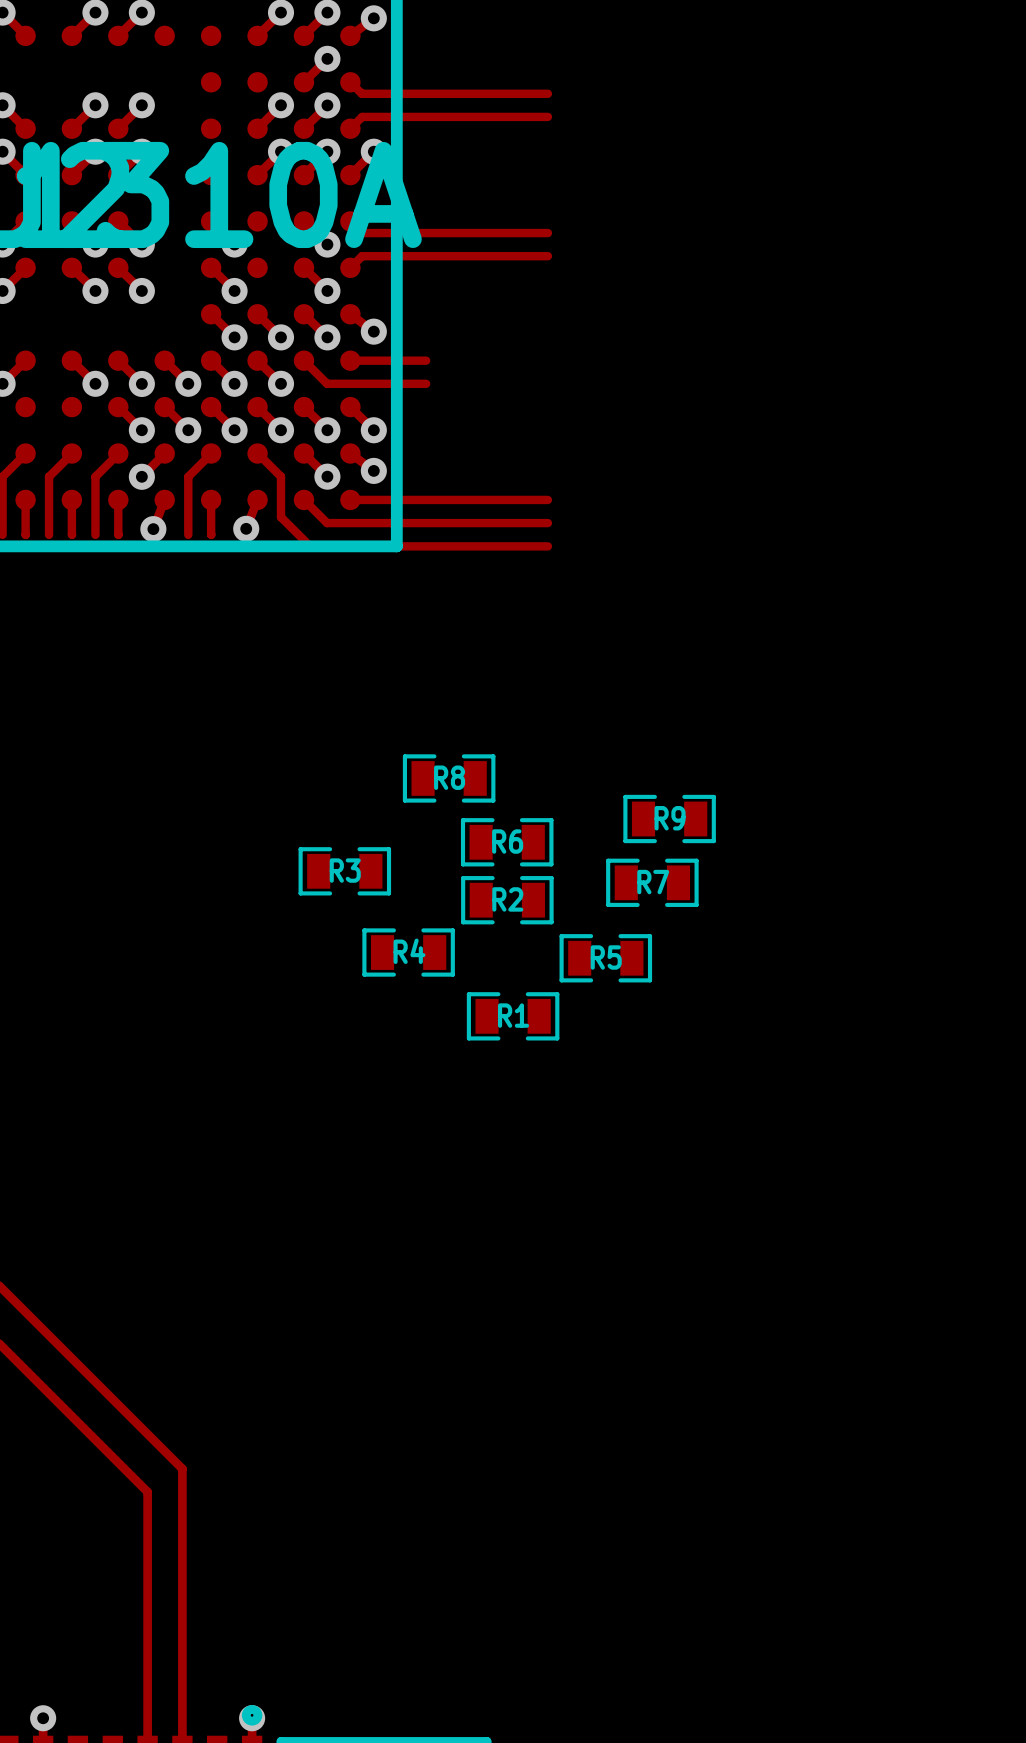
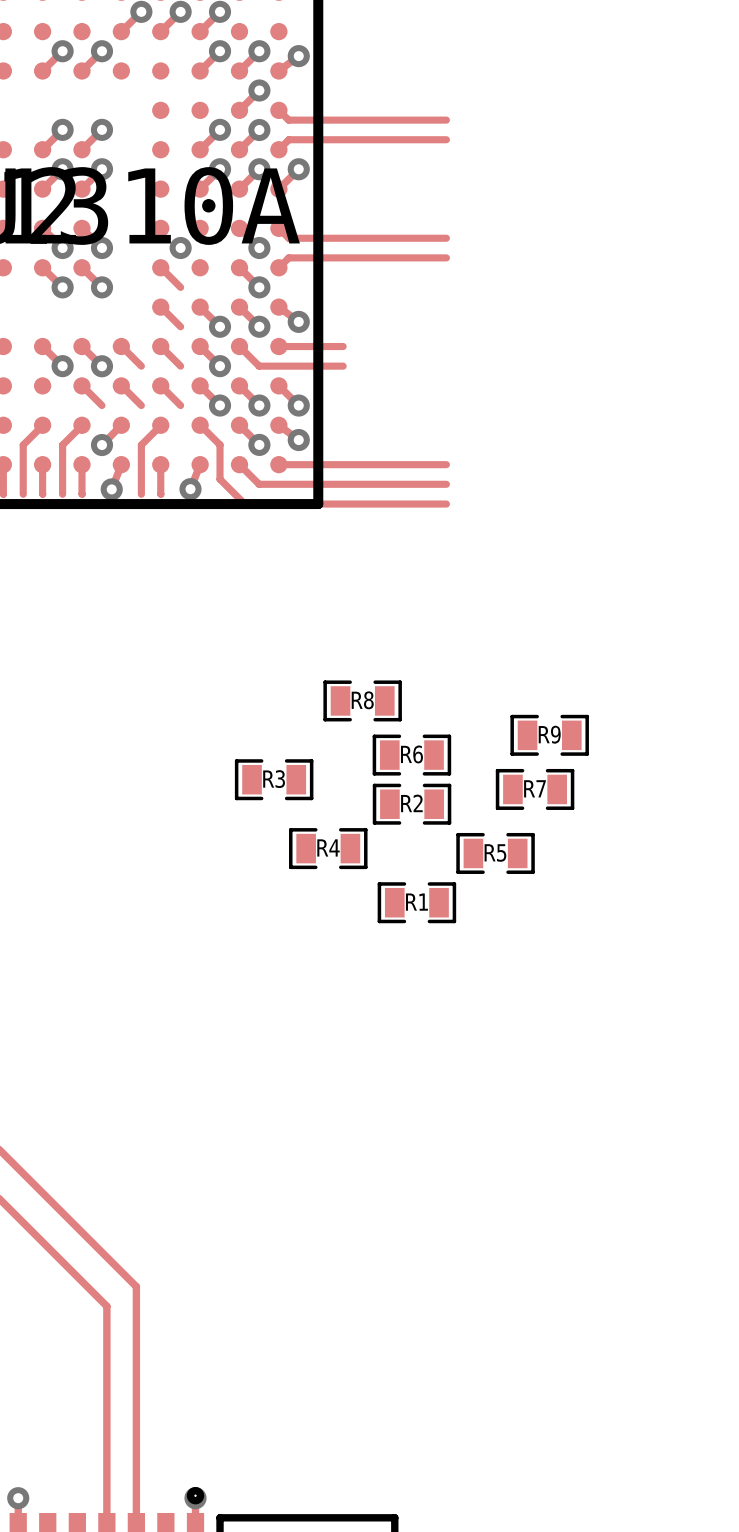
via: (234, 290) -> none
via: (234, 337) -> none
via: (188, 383) -> none
via: (234, 383) -> none
via: (141, 430) -> none
via: (188, 430) -> none
via: (234, 430) -> none

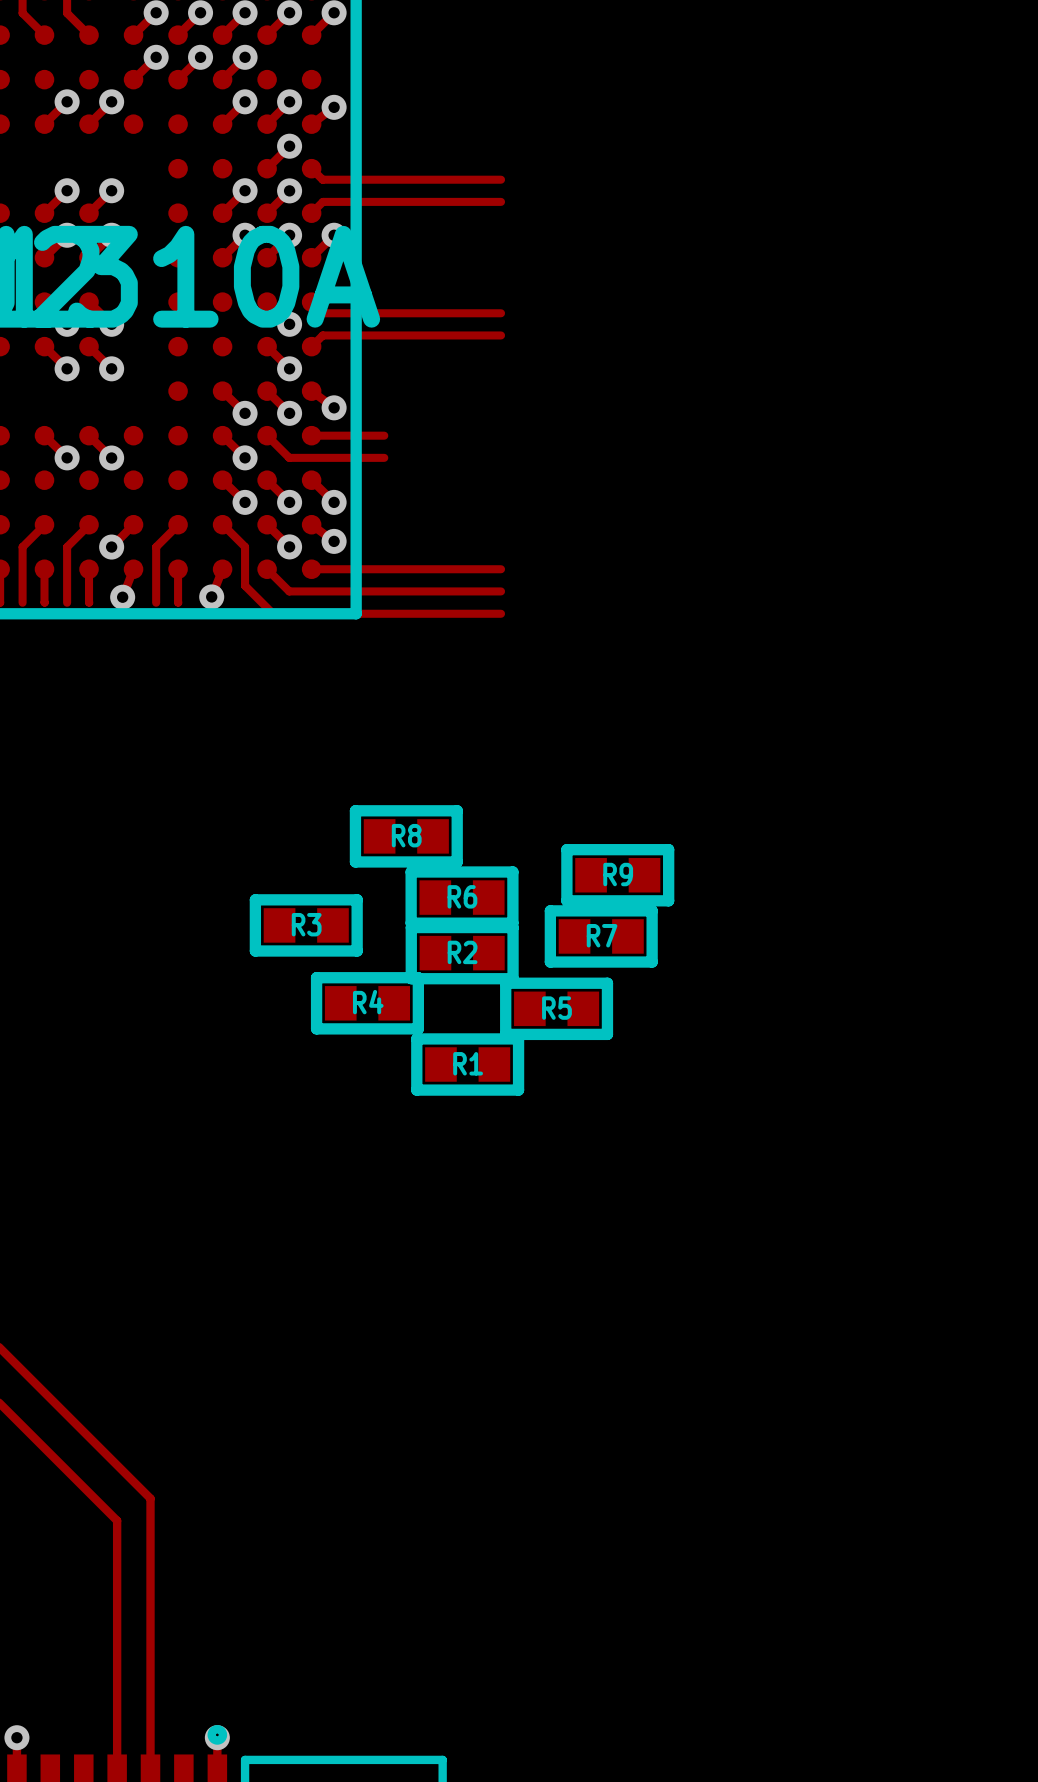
via: (180, 248) -> none
track: (161, 267) (180, 287) -> none
track: (161, 307) (180, 326) -> none
track: (121, 346) (141, 366) -> none
track: (161, 346) (180, 366) -> none
track: (82, 385) (101, 405) -> none
track: (121, 385) (141, 405) -> none
track: (161, 385) (180, 405) -> none
R8 footprint: [323, 680, 402, 722] -> [349, 805, 463, 868]
R9 footprint: [510, 714, 589, 756] -> [561, 844, 675, 907]
R6 footprint: [372, 734, 452, 776] -> [405, 866, 519, 929]
R3 footprint: [234, 759, 314, 801] -> [249, 894, 363, 957]
R7 footprint: [495, 768, 575, 810] -> [544, 905, 658, 968]
R2 footprint: [372, 783, 452, 825] -> [405, 921, 519, 985]
R4 footprint: [289, 828, 368, 870] -> [310, 972, 425, 1035]
R5 footprint: [456, 832, 535, 874] -> [500, 977, 614, 1041]
R1 footprint: [377, 882, 457, 924] -> [411, 1033, 525, 1096]

